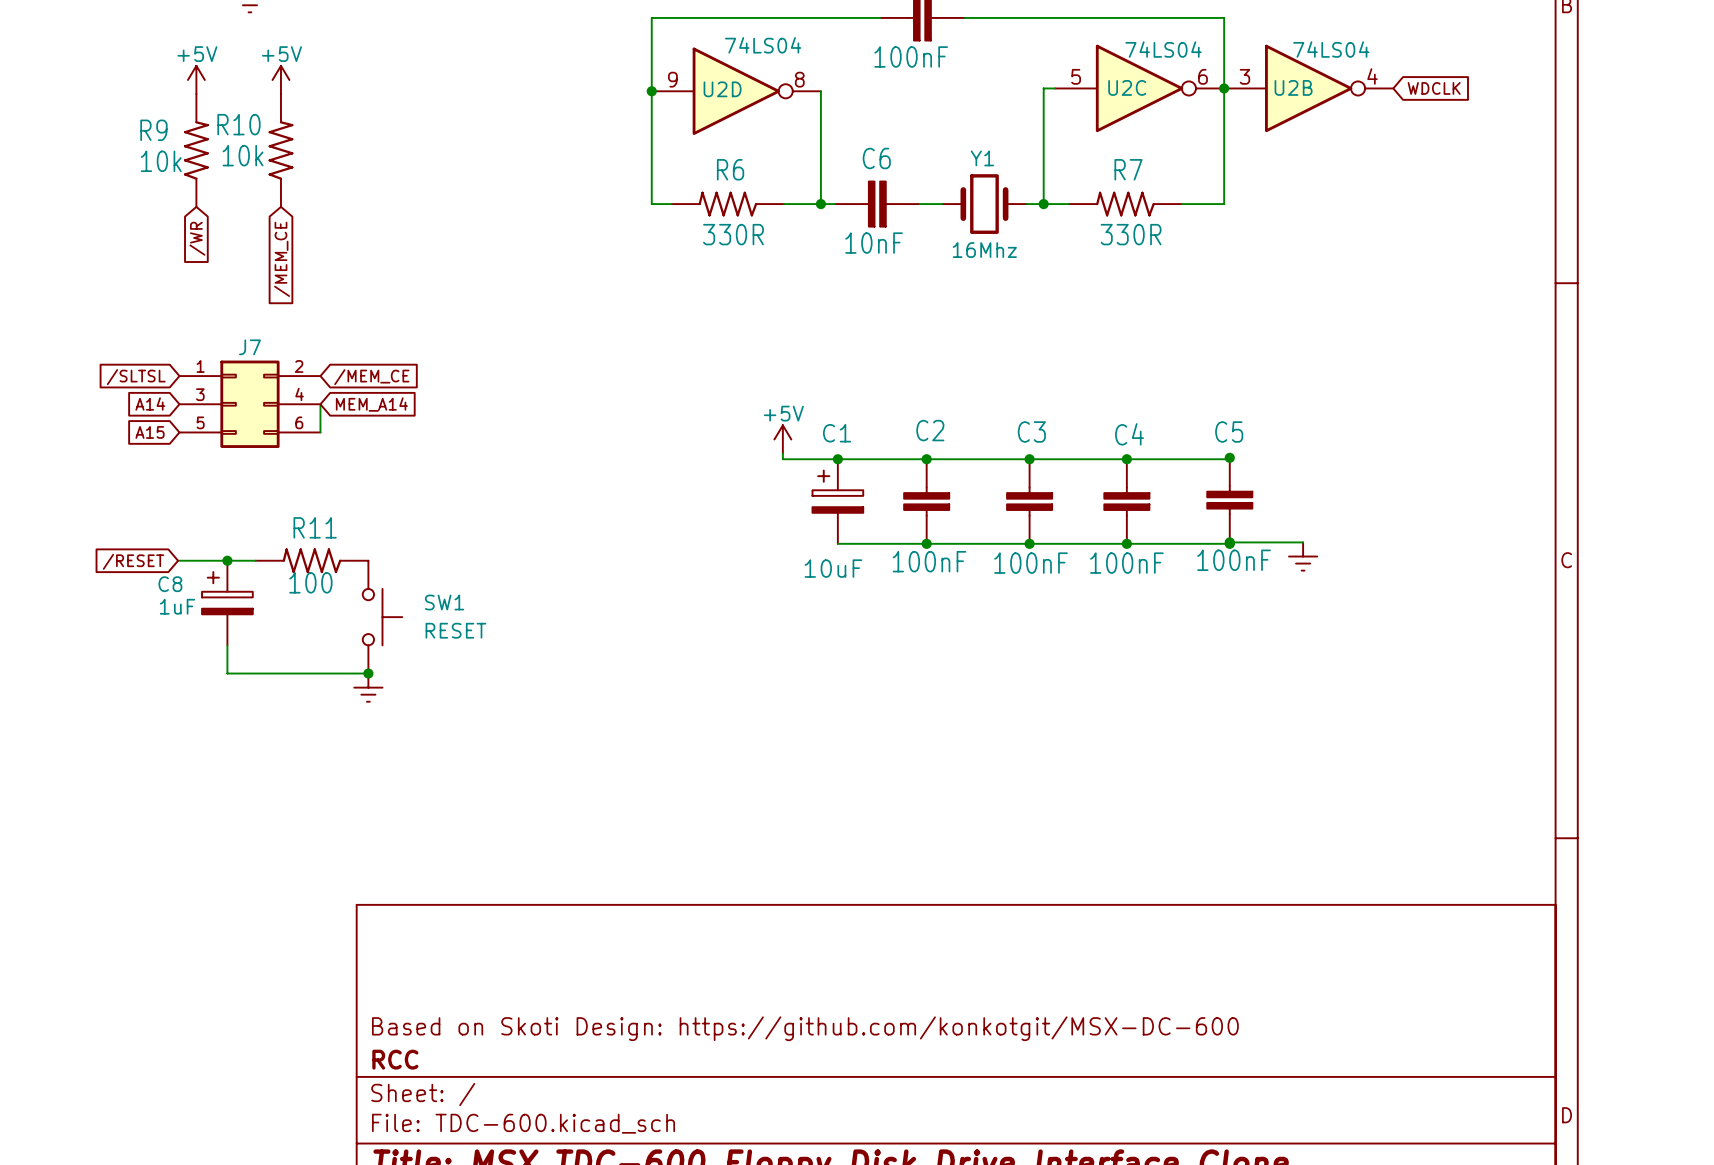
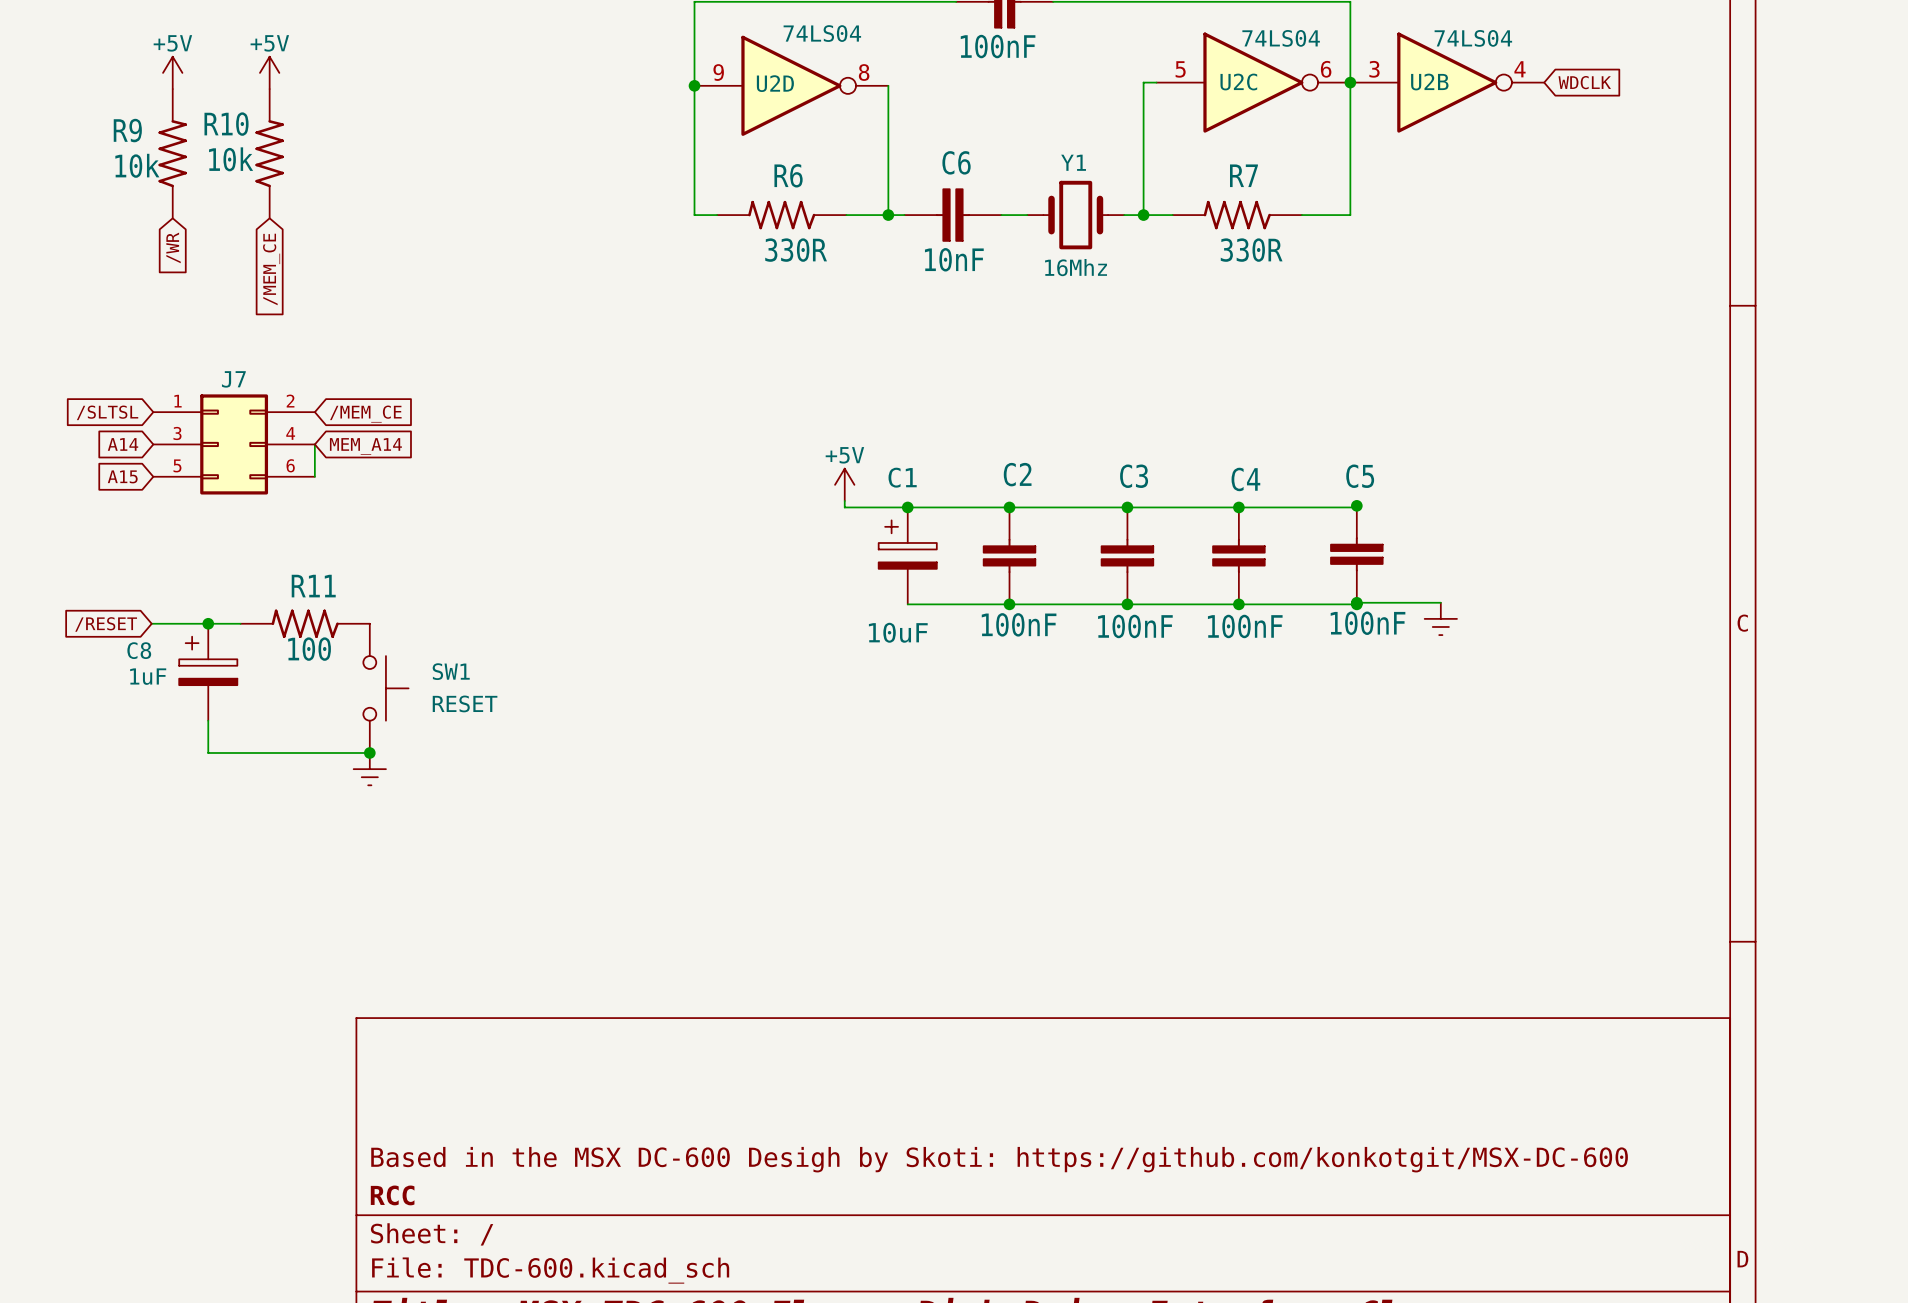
title block: Based on Skoti Design: https://github.com/konkotgit/MSX-DC-600 (805, 1028) -> Based in the MSX DC-600 Desigh by Skoti: https://github.com/konkotgit/MSX-DC-600 (999, 1159)

